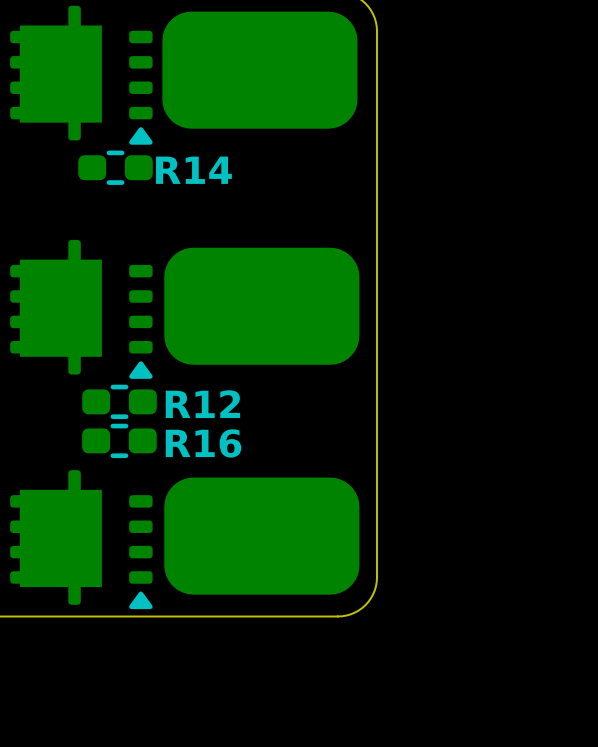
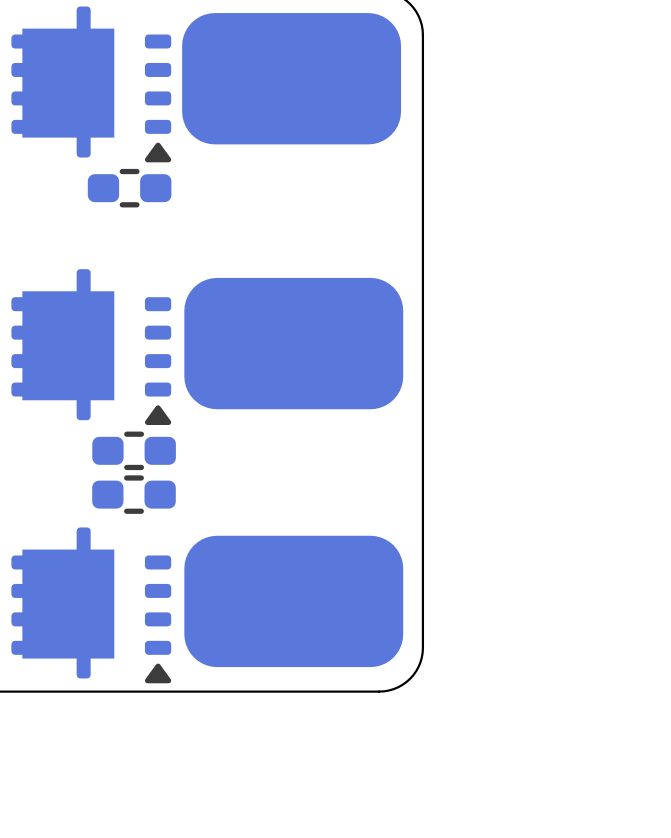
text: R14 (193, 170) -> none
text: R12 (202, 404) -> none
text: R16 (203, 443) -> none

